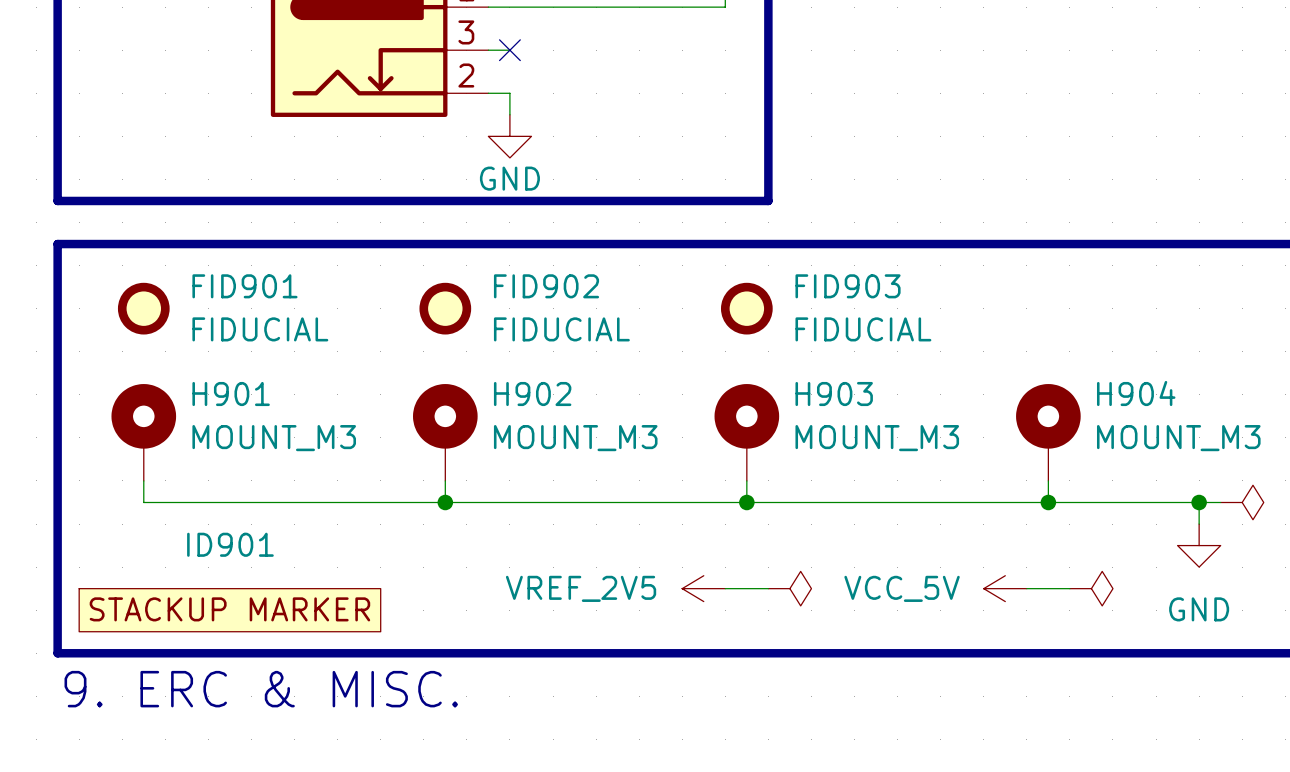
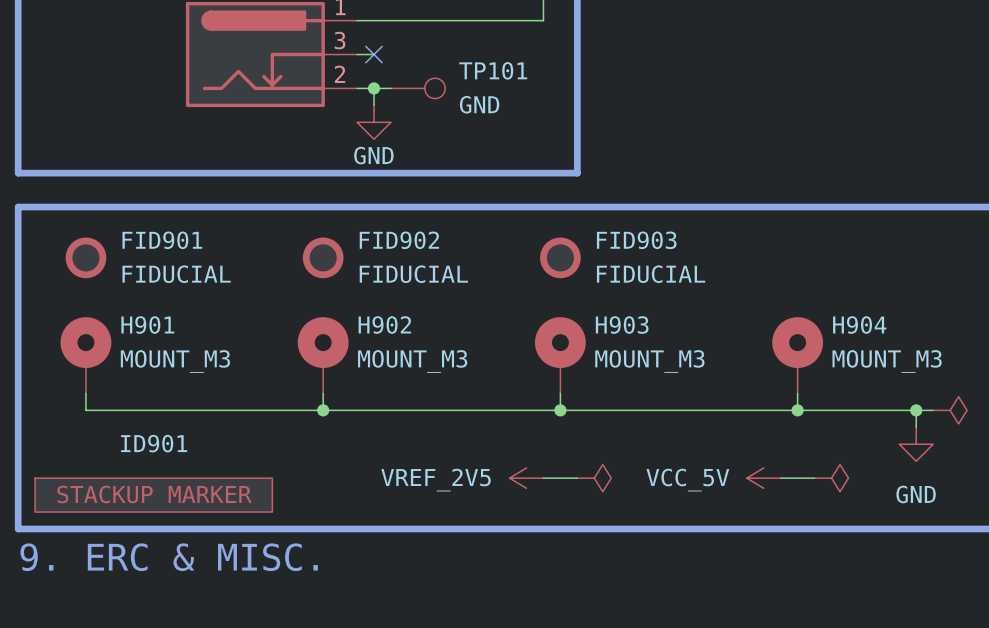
wire: none -> (374, 88) (390, 88)
junction: none -> (374, 88)
TP101: none -> GND (418, 88)

